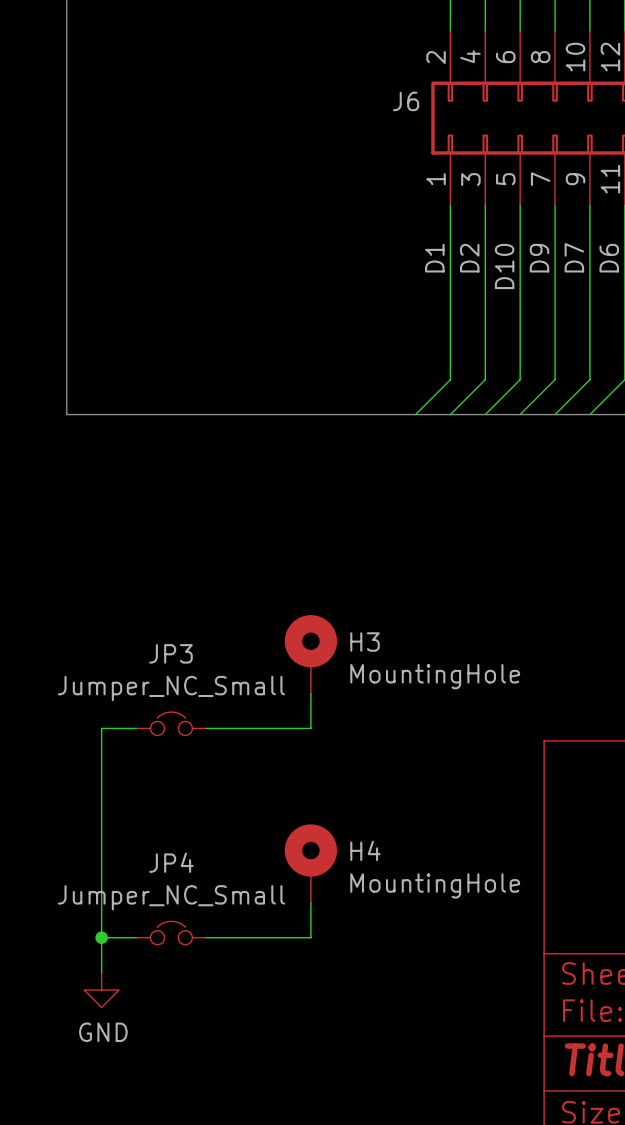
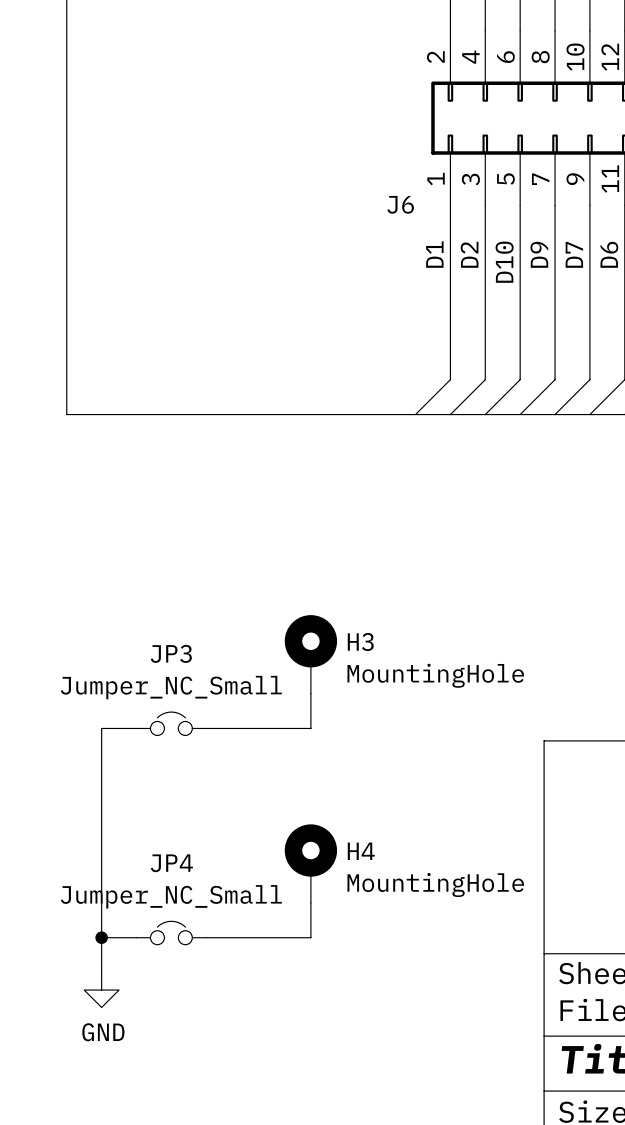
J6 name position: J6 (406, 101) -> J6 (400, 204)

